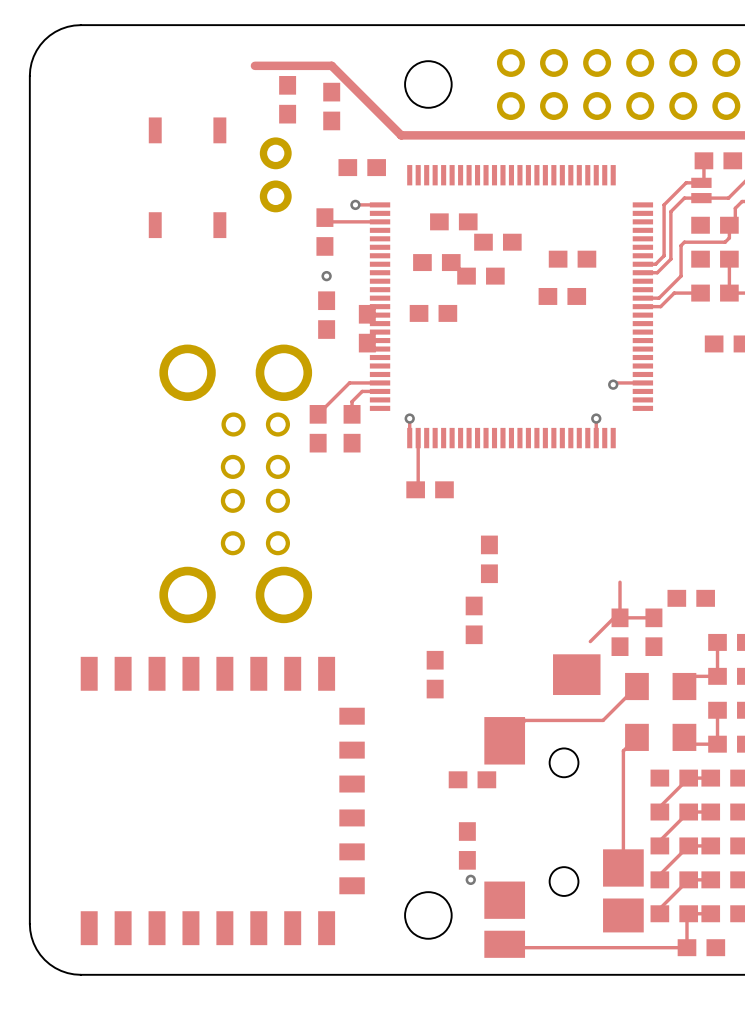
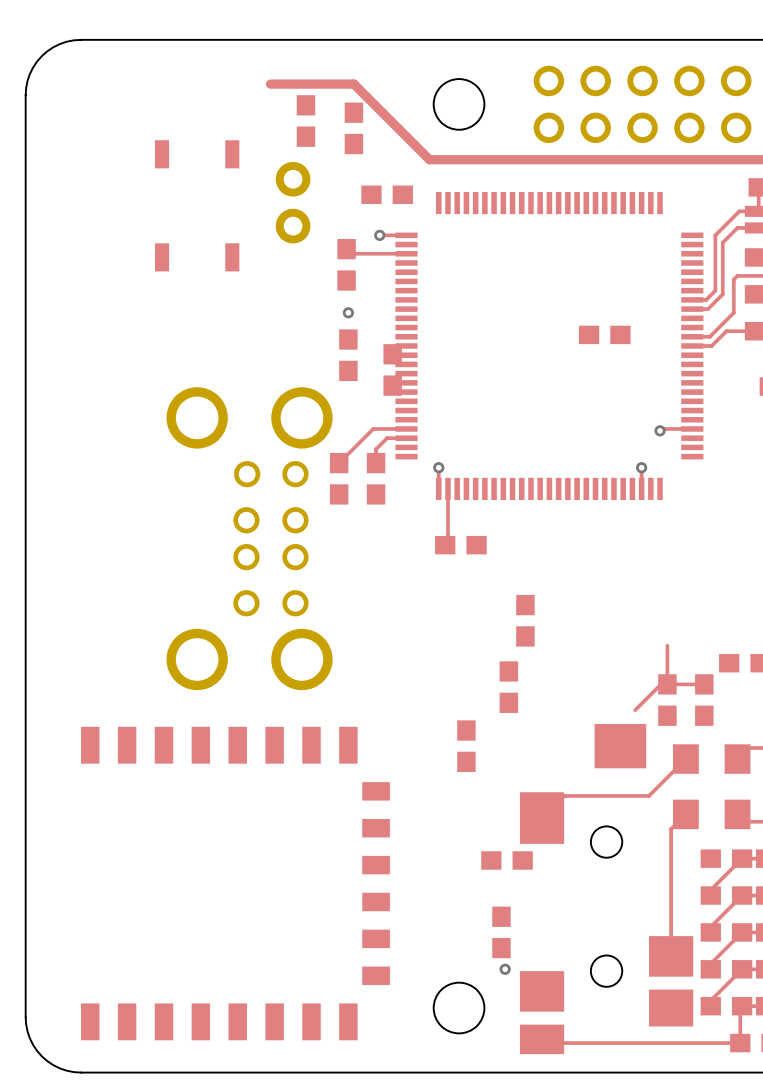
part: (453, 221) -> none
part: (497, 242) -> none
part: (572, 259) -> none
part: (436, 262) -> none
part: (480, 276) -> none
part: (433, 313) -> none

